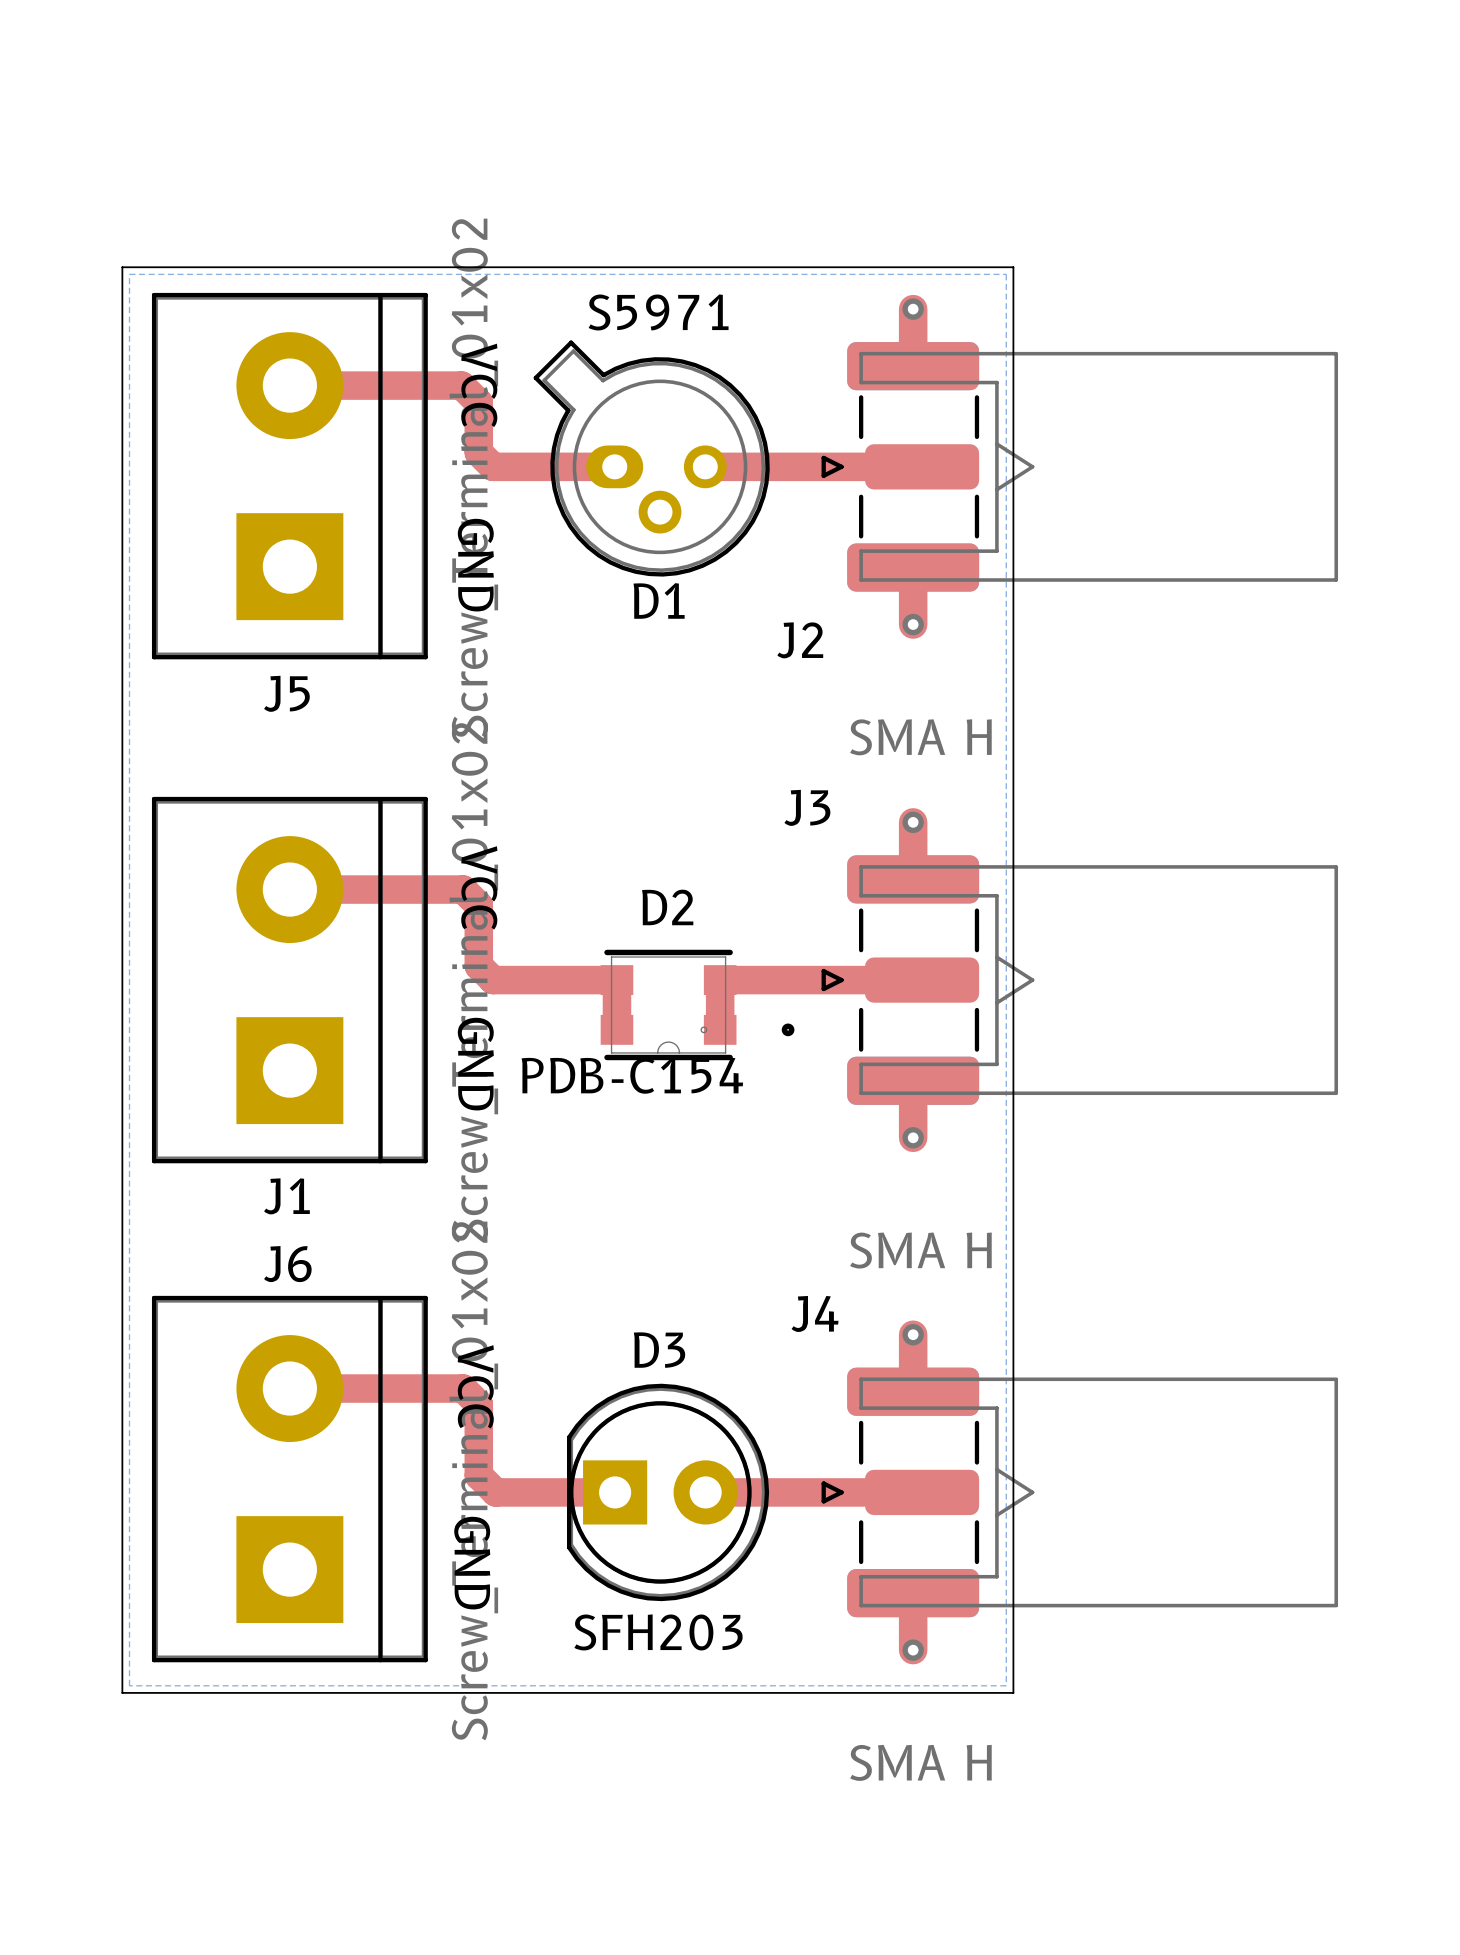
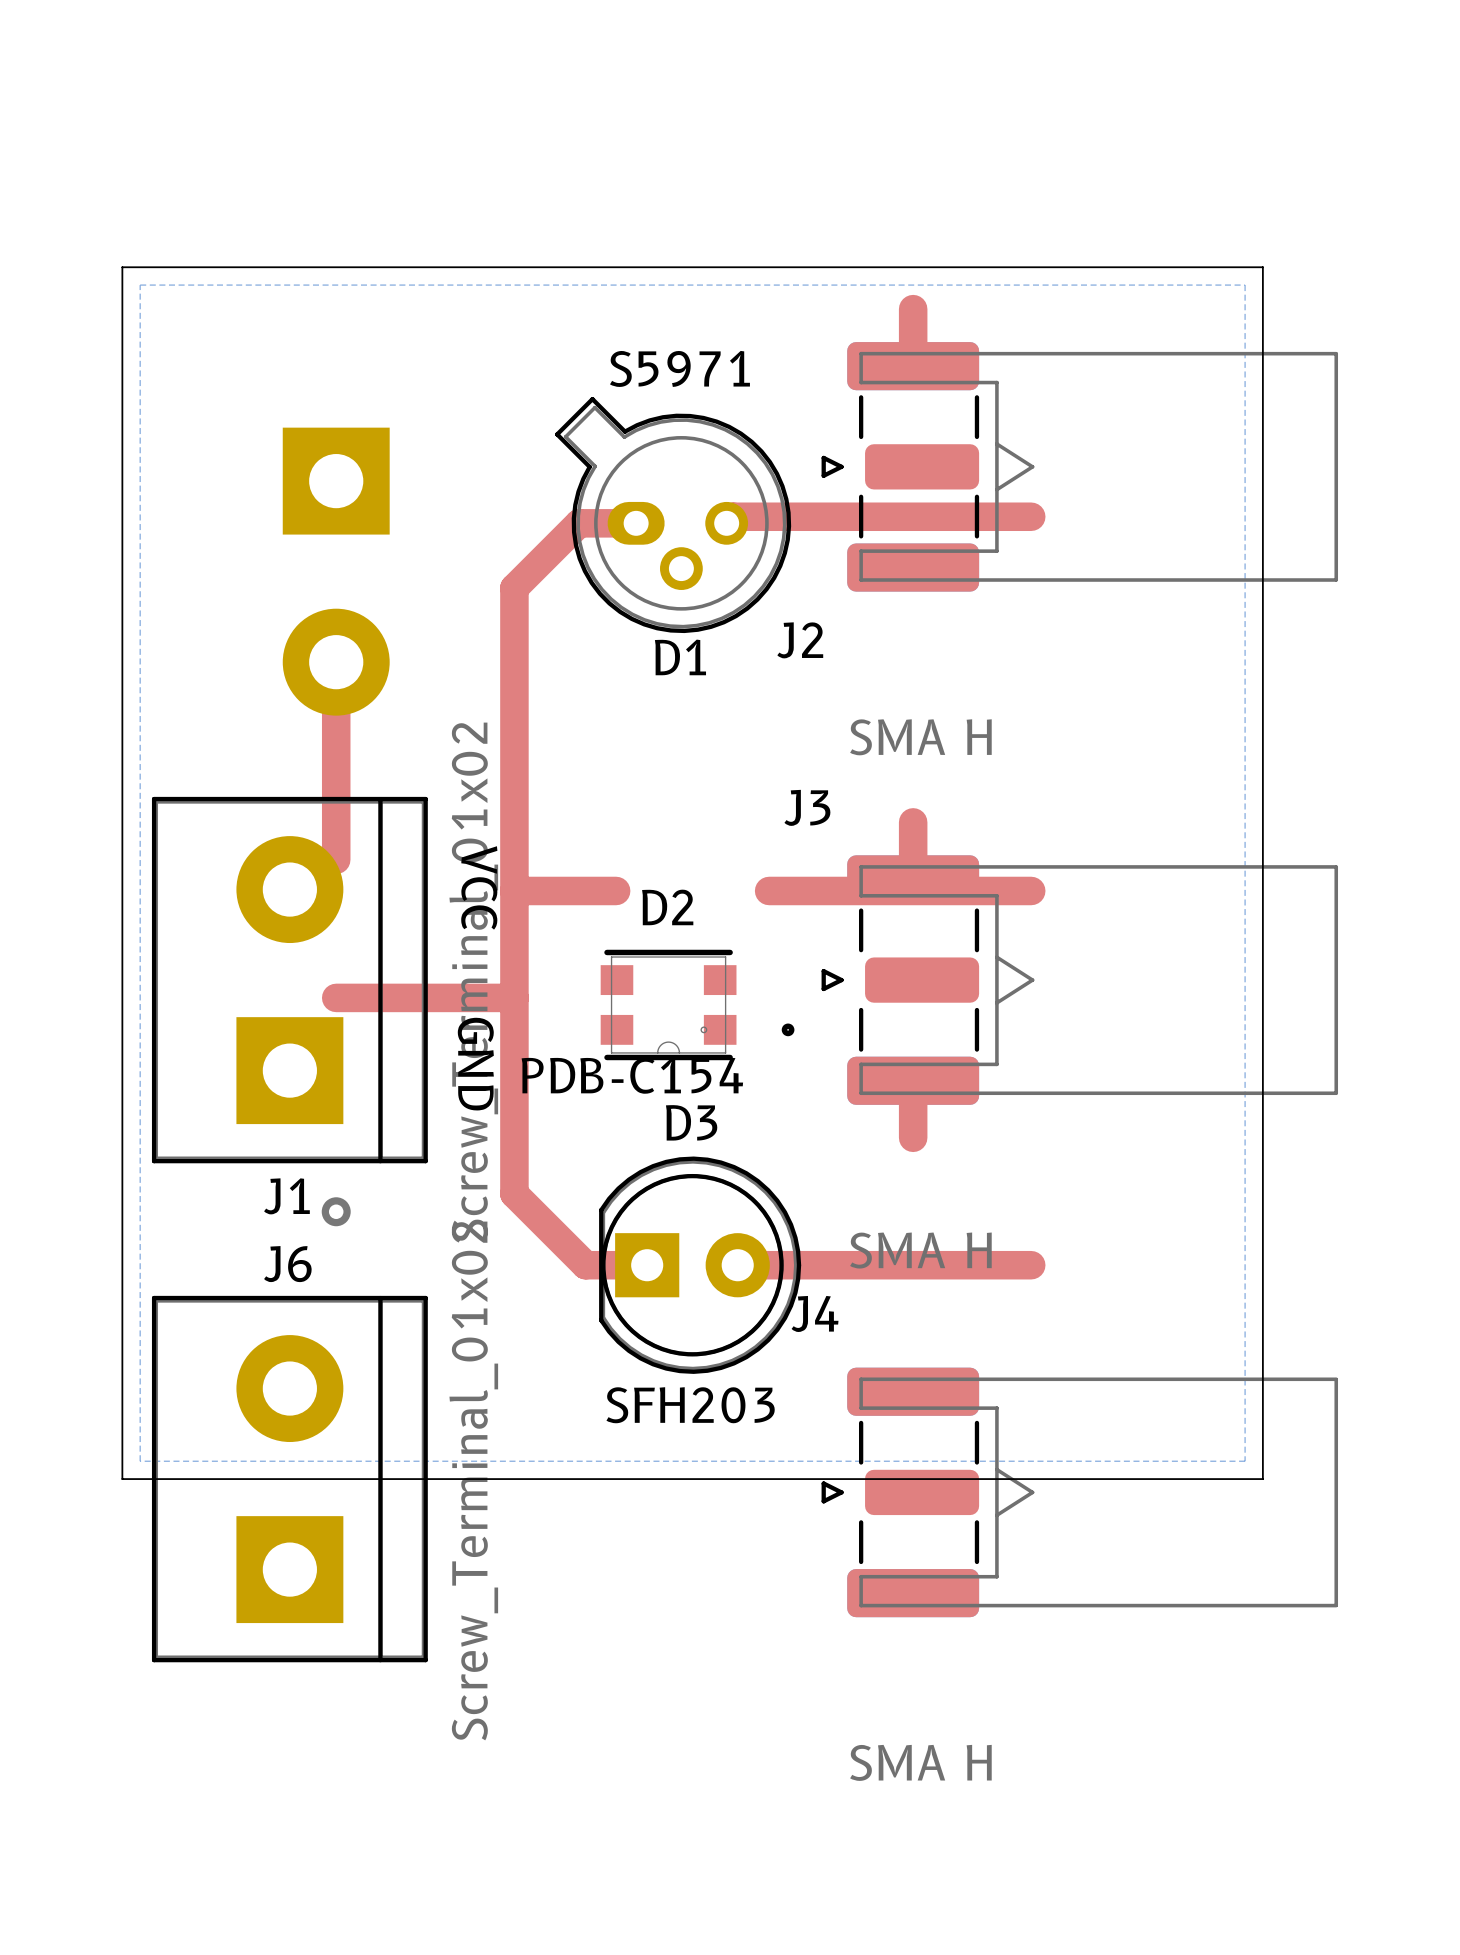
board edge: (1013, 267) (1013, 1692) (122, 1692) (122, 1479) -> (1013, 267) (1262, 267) (1262, 1479) (122, 1479)
bottom zone outline: (129, 274) (1006, 274) (1006, 1685) (129, 1685) (129, 274) -> (140, 285) (140, 1461) (1245, 1461) (1245, 285) (140, 285)
via: (913, 309) -> none
top track: (289, 385) (461, 385) (478, 402) (478, 452) (493, 466) (614, 466) -> none
text: VCC (479, 385) -> none
D1 position: (651, 458) -> (673, 515)
top track: (705, 466) (922, 466) -> none
J5 side: top (289, 476) -> bottom (336, 571)
top track: none -> (1031, 516) (733, 516) (726, 523)
top track: none -> (636, 523) (579, 523) (514, 588) (514, 1193) (585, 1265) (647, 1265)
text: GND (475, 565) -> none
top track: (913, 567) (913, 624) -> none
via: (913, 624) -> none
top track: none -> (336, 662) (336, 859)
via: (913, 822) -> none
top track: (289, 889) (463, 889) (478, 905) (478, 965) (493, 980) (616, 980) (616, 1029) -> none
top track: none -> (514, 890) (616, 890)
top track: none -> (769, 890) (1031, 890)
top track: (922, 980) (720, 980) (720, 1029) -> none
top track: none -> (336, 997) (514, 997)
via: (913, 1137) -> none
via: none -> (336, 1211)
top track: none -> (737, 1265) (1031, 1265)
top track: (913, 1334) (913, 1391) -> none
via: (913, 1334) -> none
text: VCC (475, 1386) -> none
top track: (289, 1388) (463, 1388) (478, 1404) (478, 1475) (495, 1492) (615, 1492) -> none
D3 position: (668, 1492) -> (700, 1265)
top track: (705, 1492) (922, 1492) -> none
text: GND (472, 1563) -> none
top track: (913, 1593) (913, 1650) -> none
via: (913, 1650) -> none

